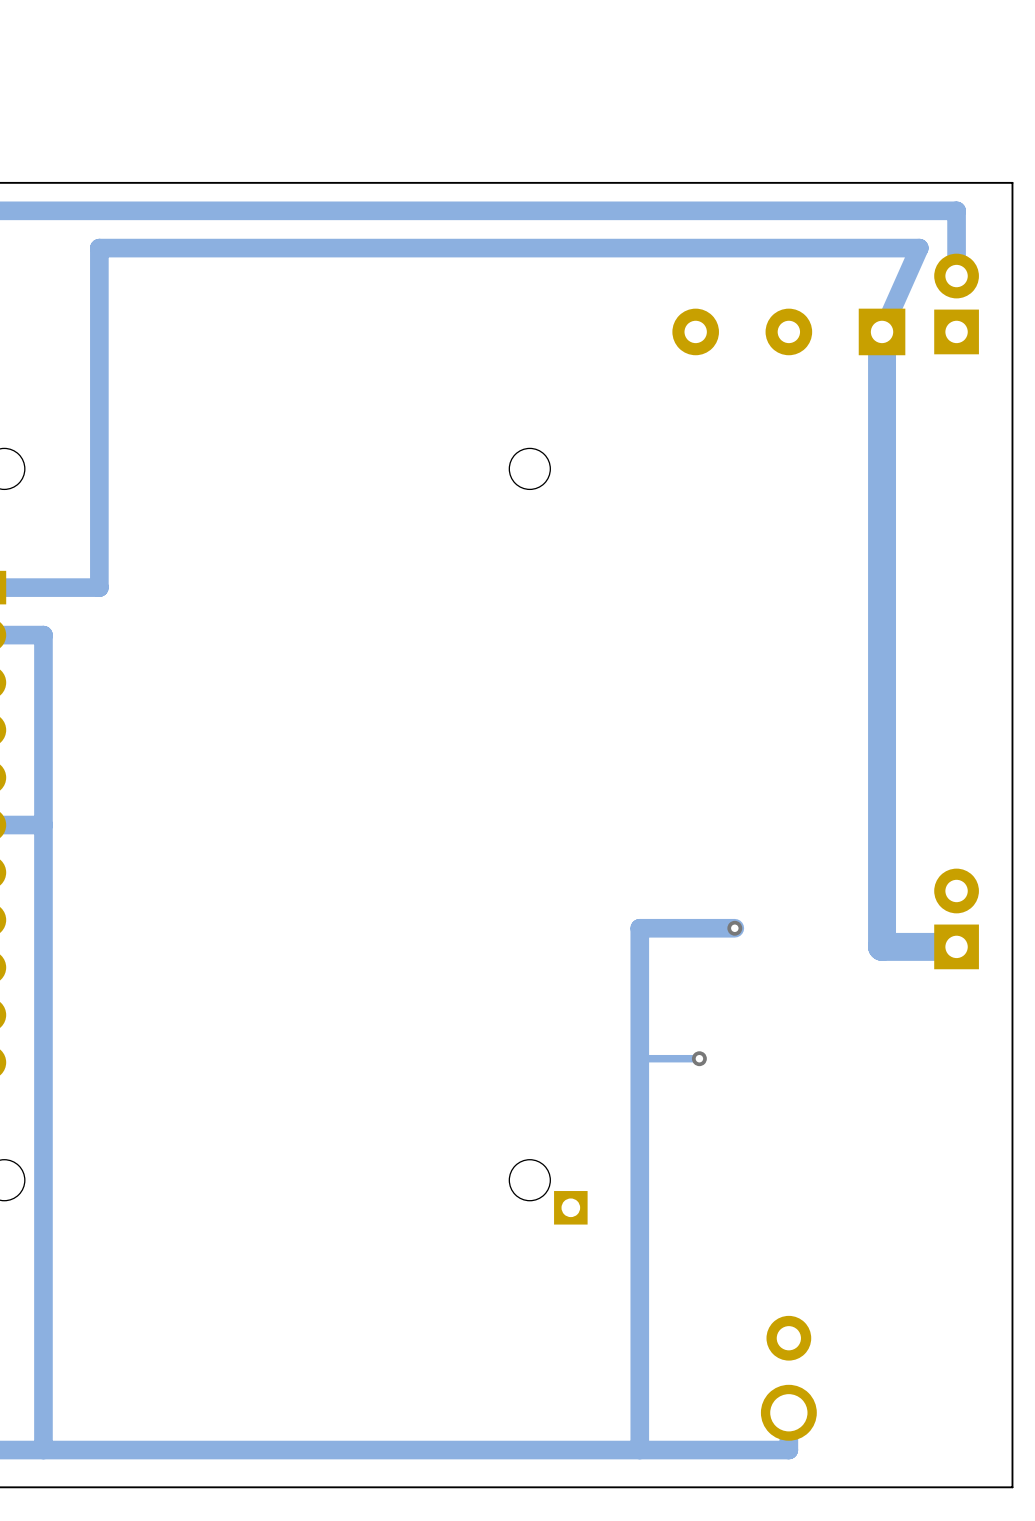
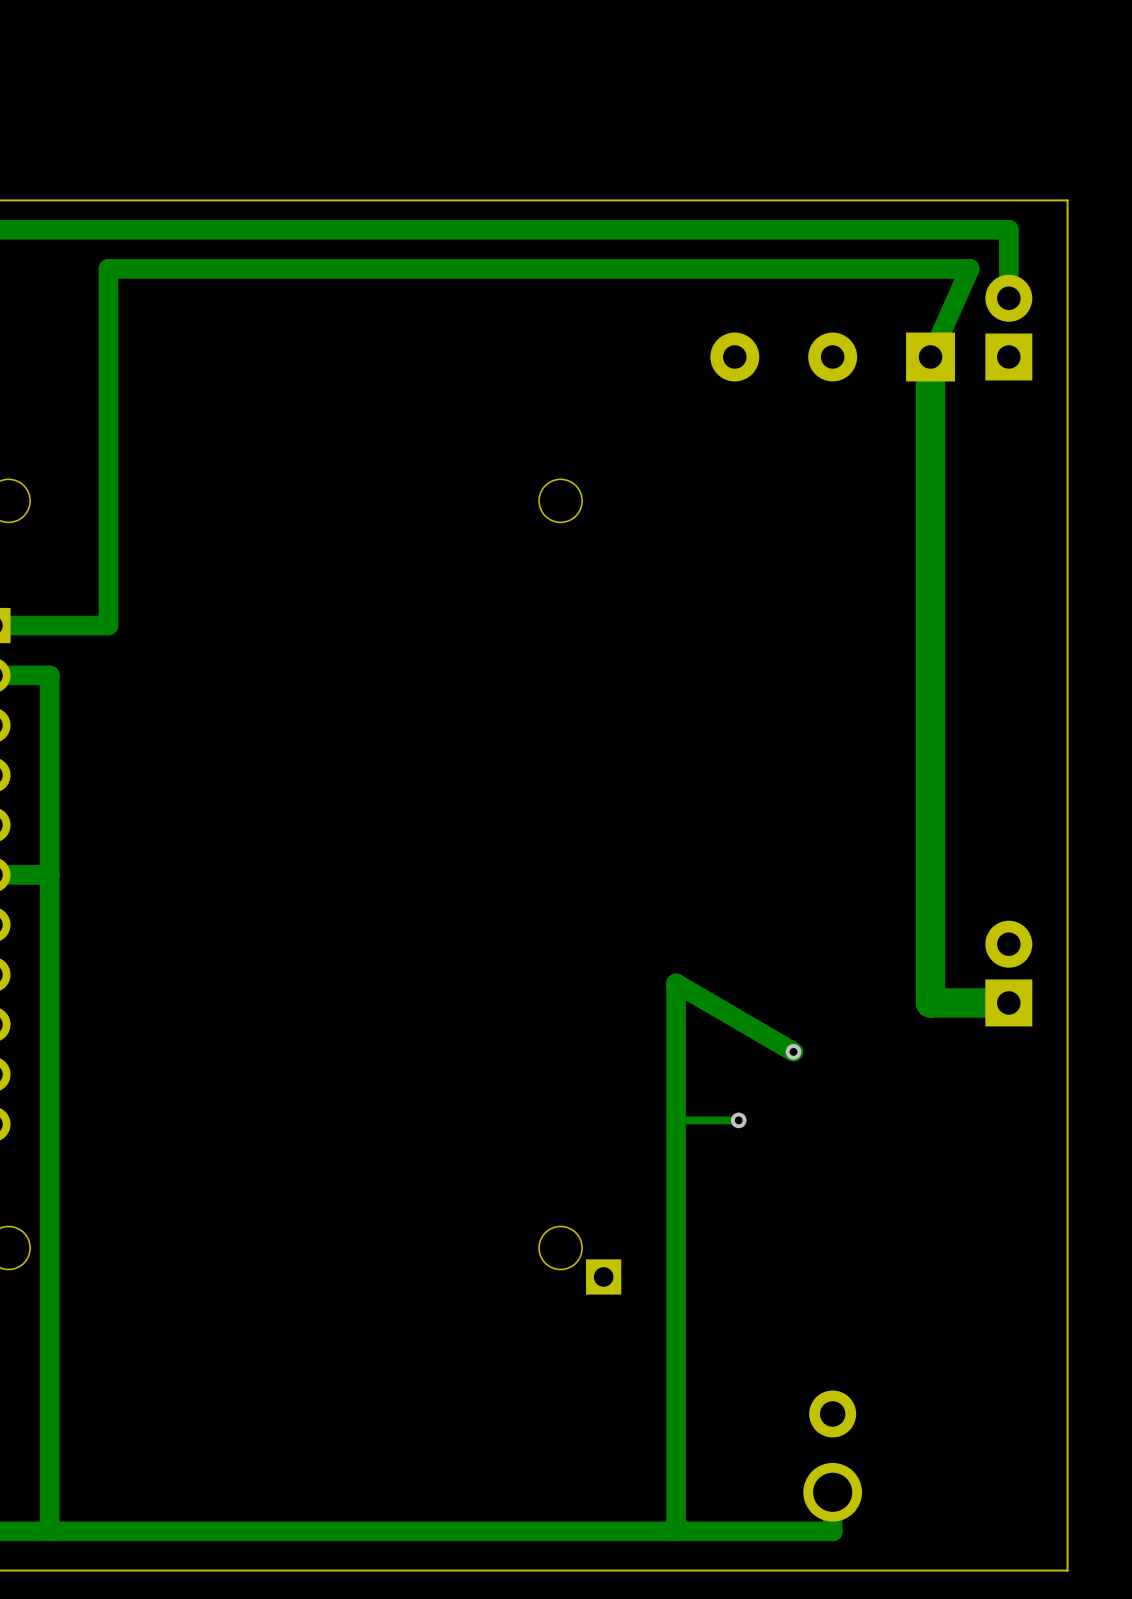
track: (734, 928) (639, 928) -> (793, 1051) (676, 983)
via position: (734, 928) -> (793, 1051)

